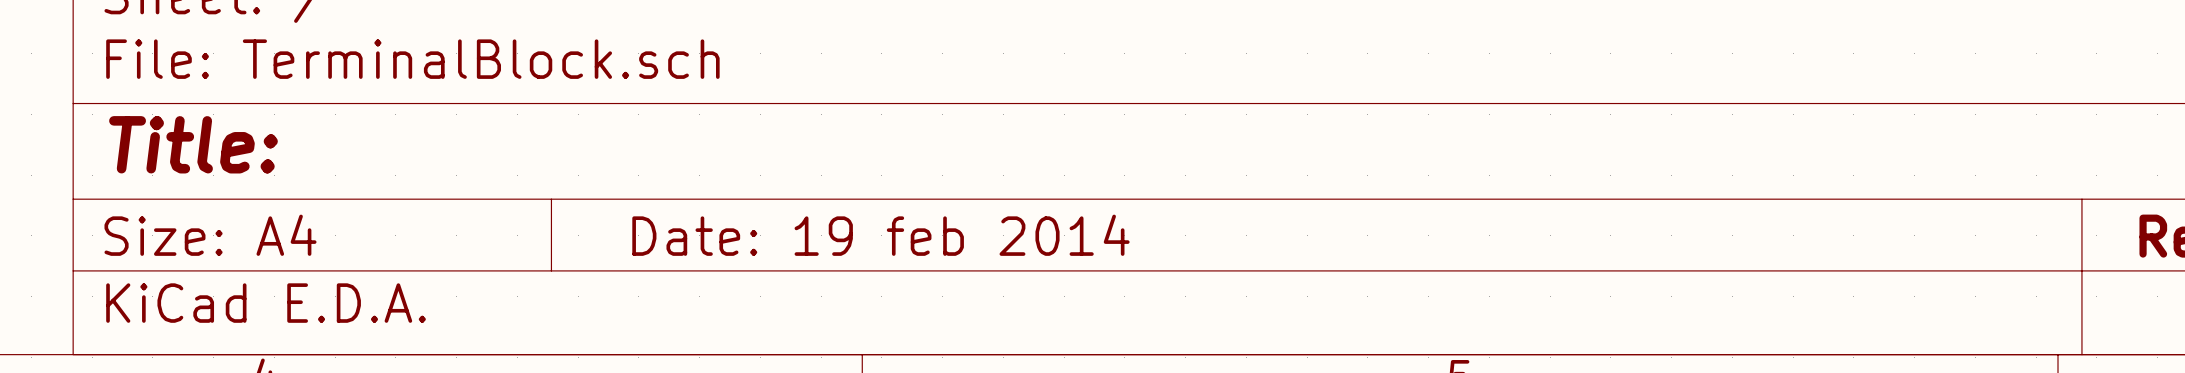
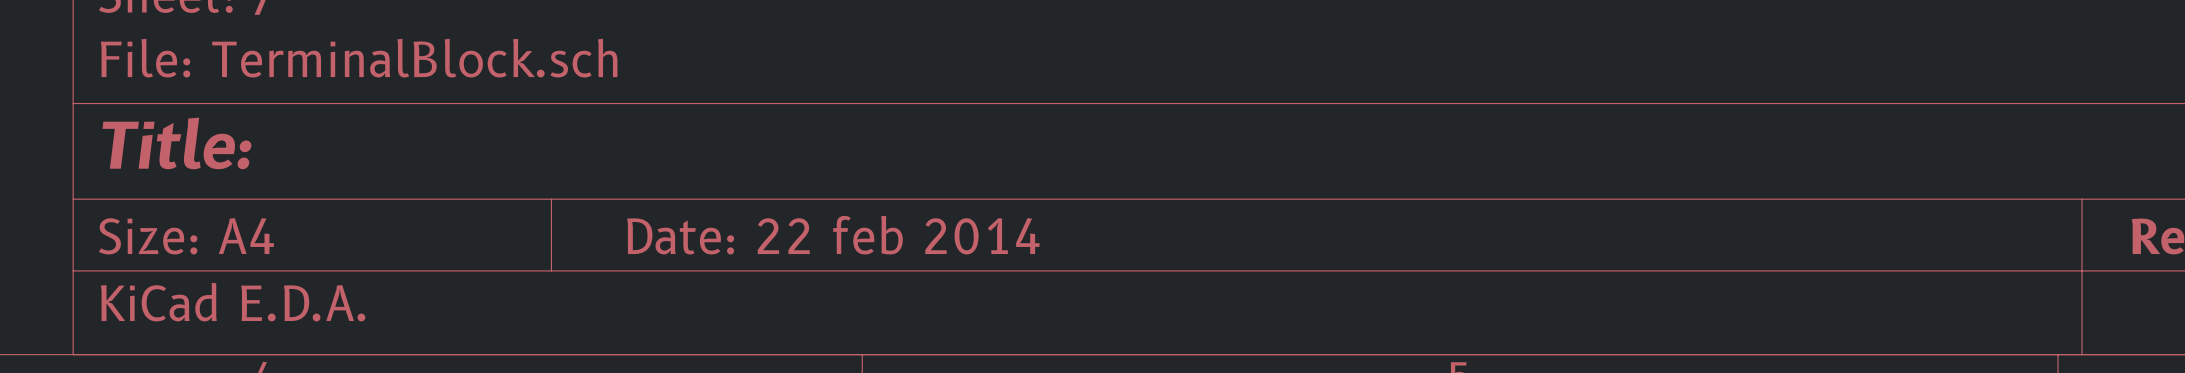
title block: Date: 19 feb 2014 (880, 235) -> Date: 22 feb 2014 (833, 235)

